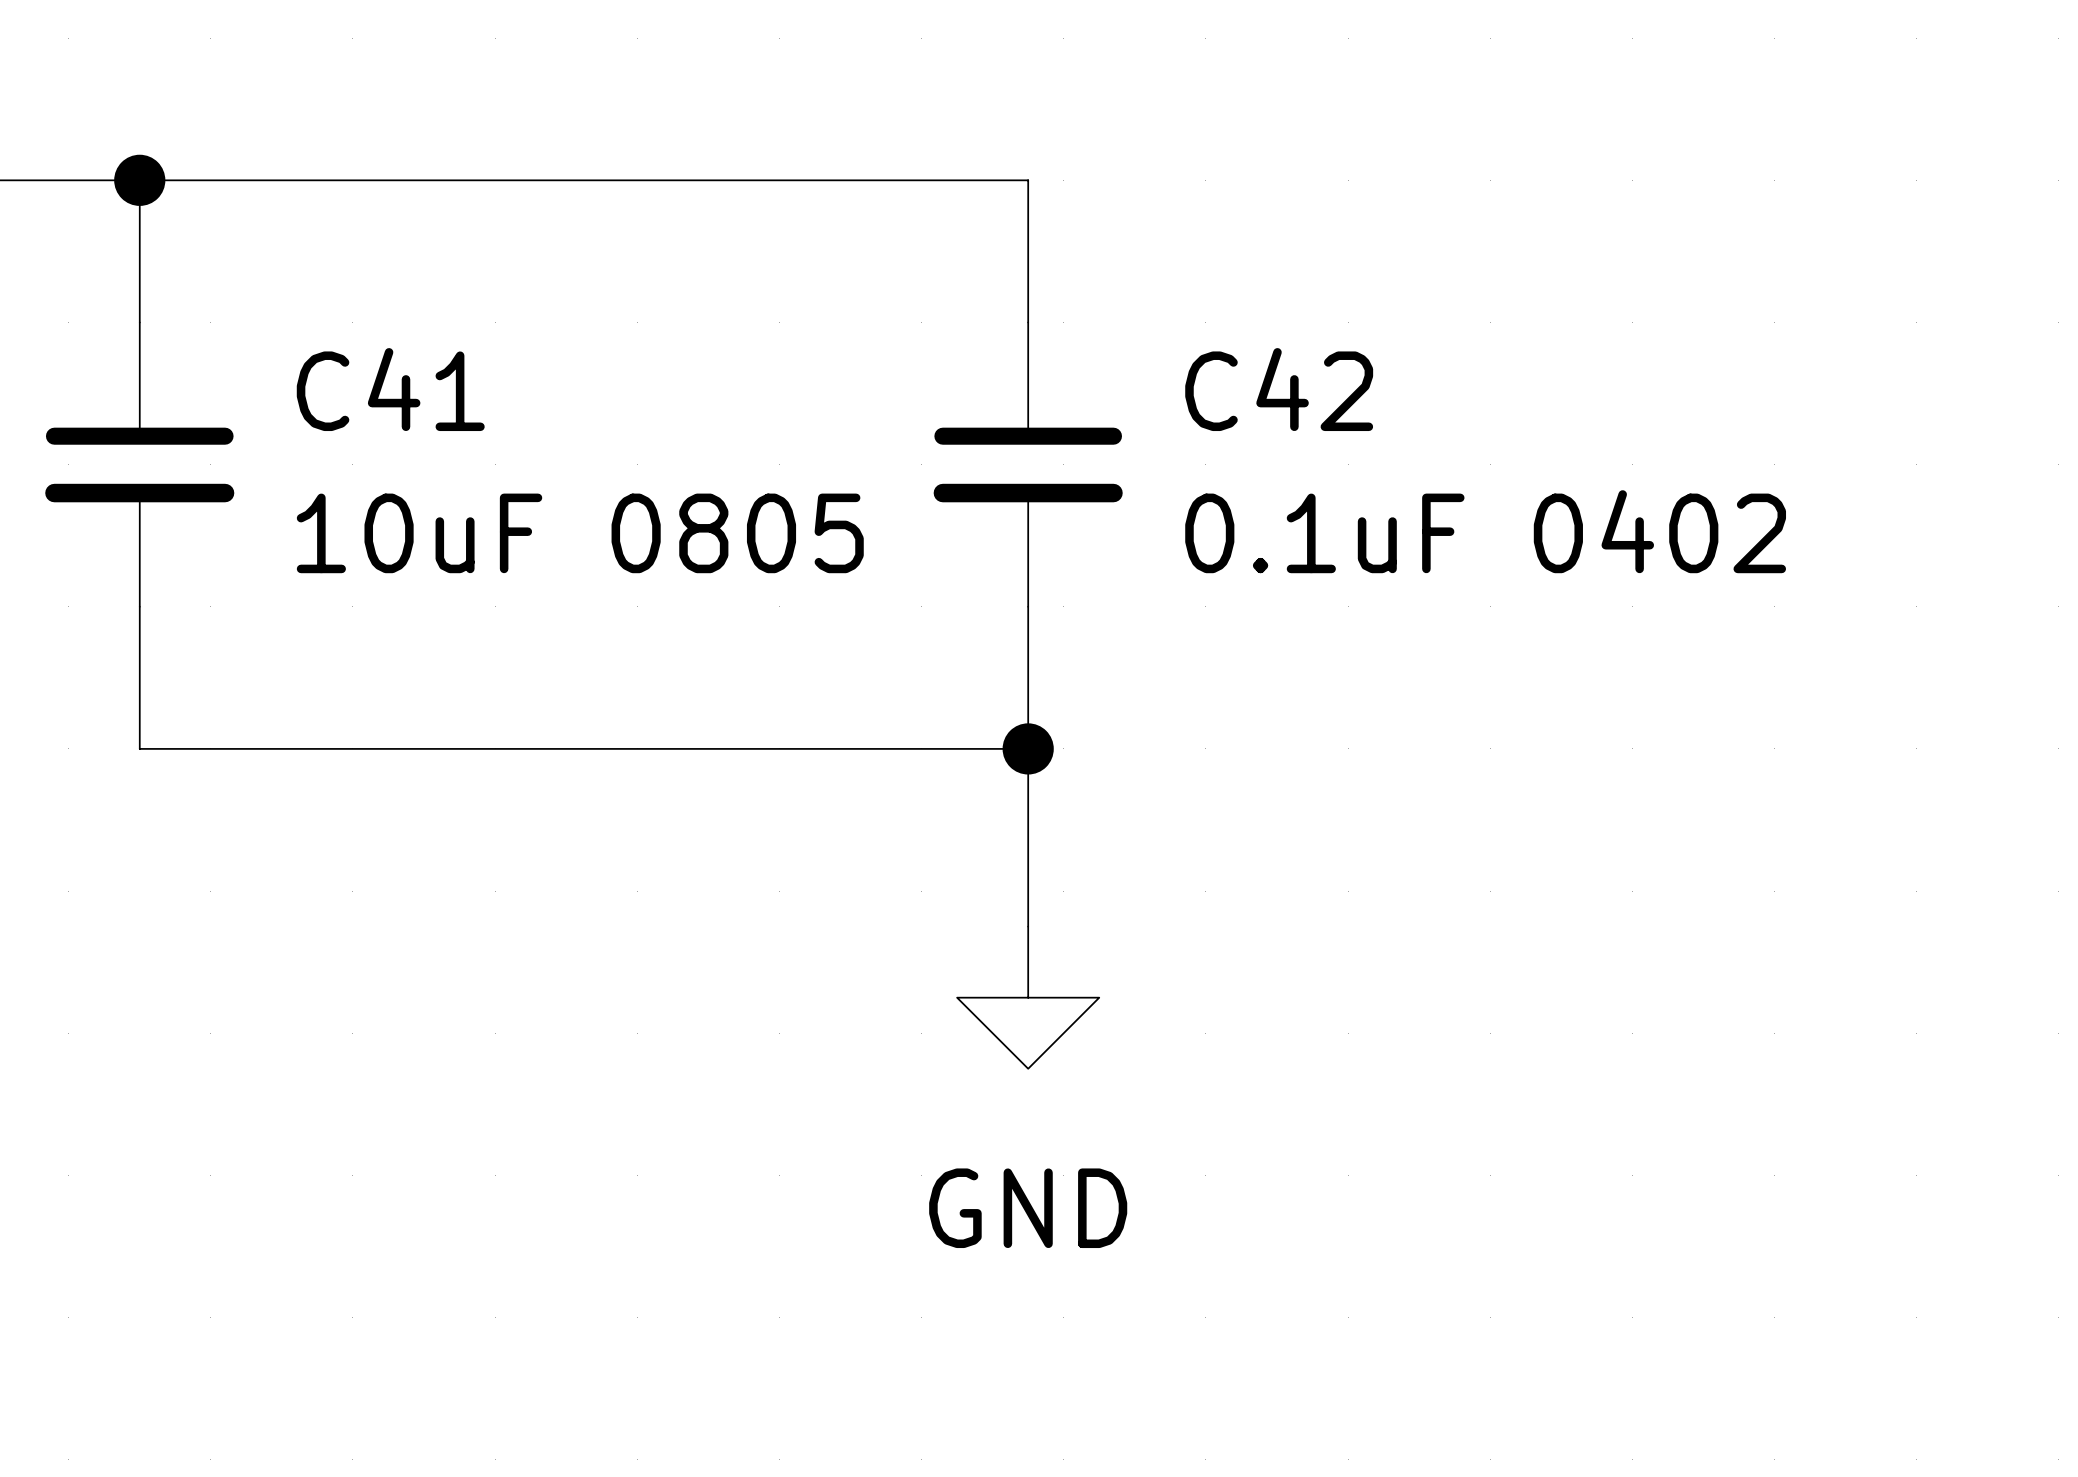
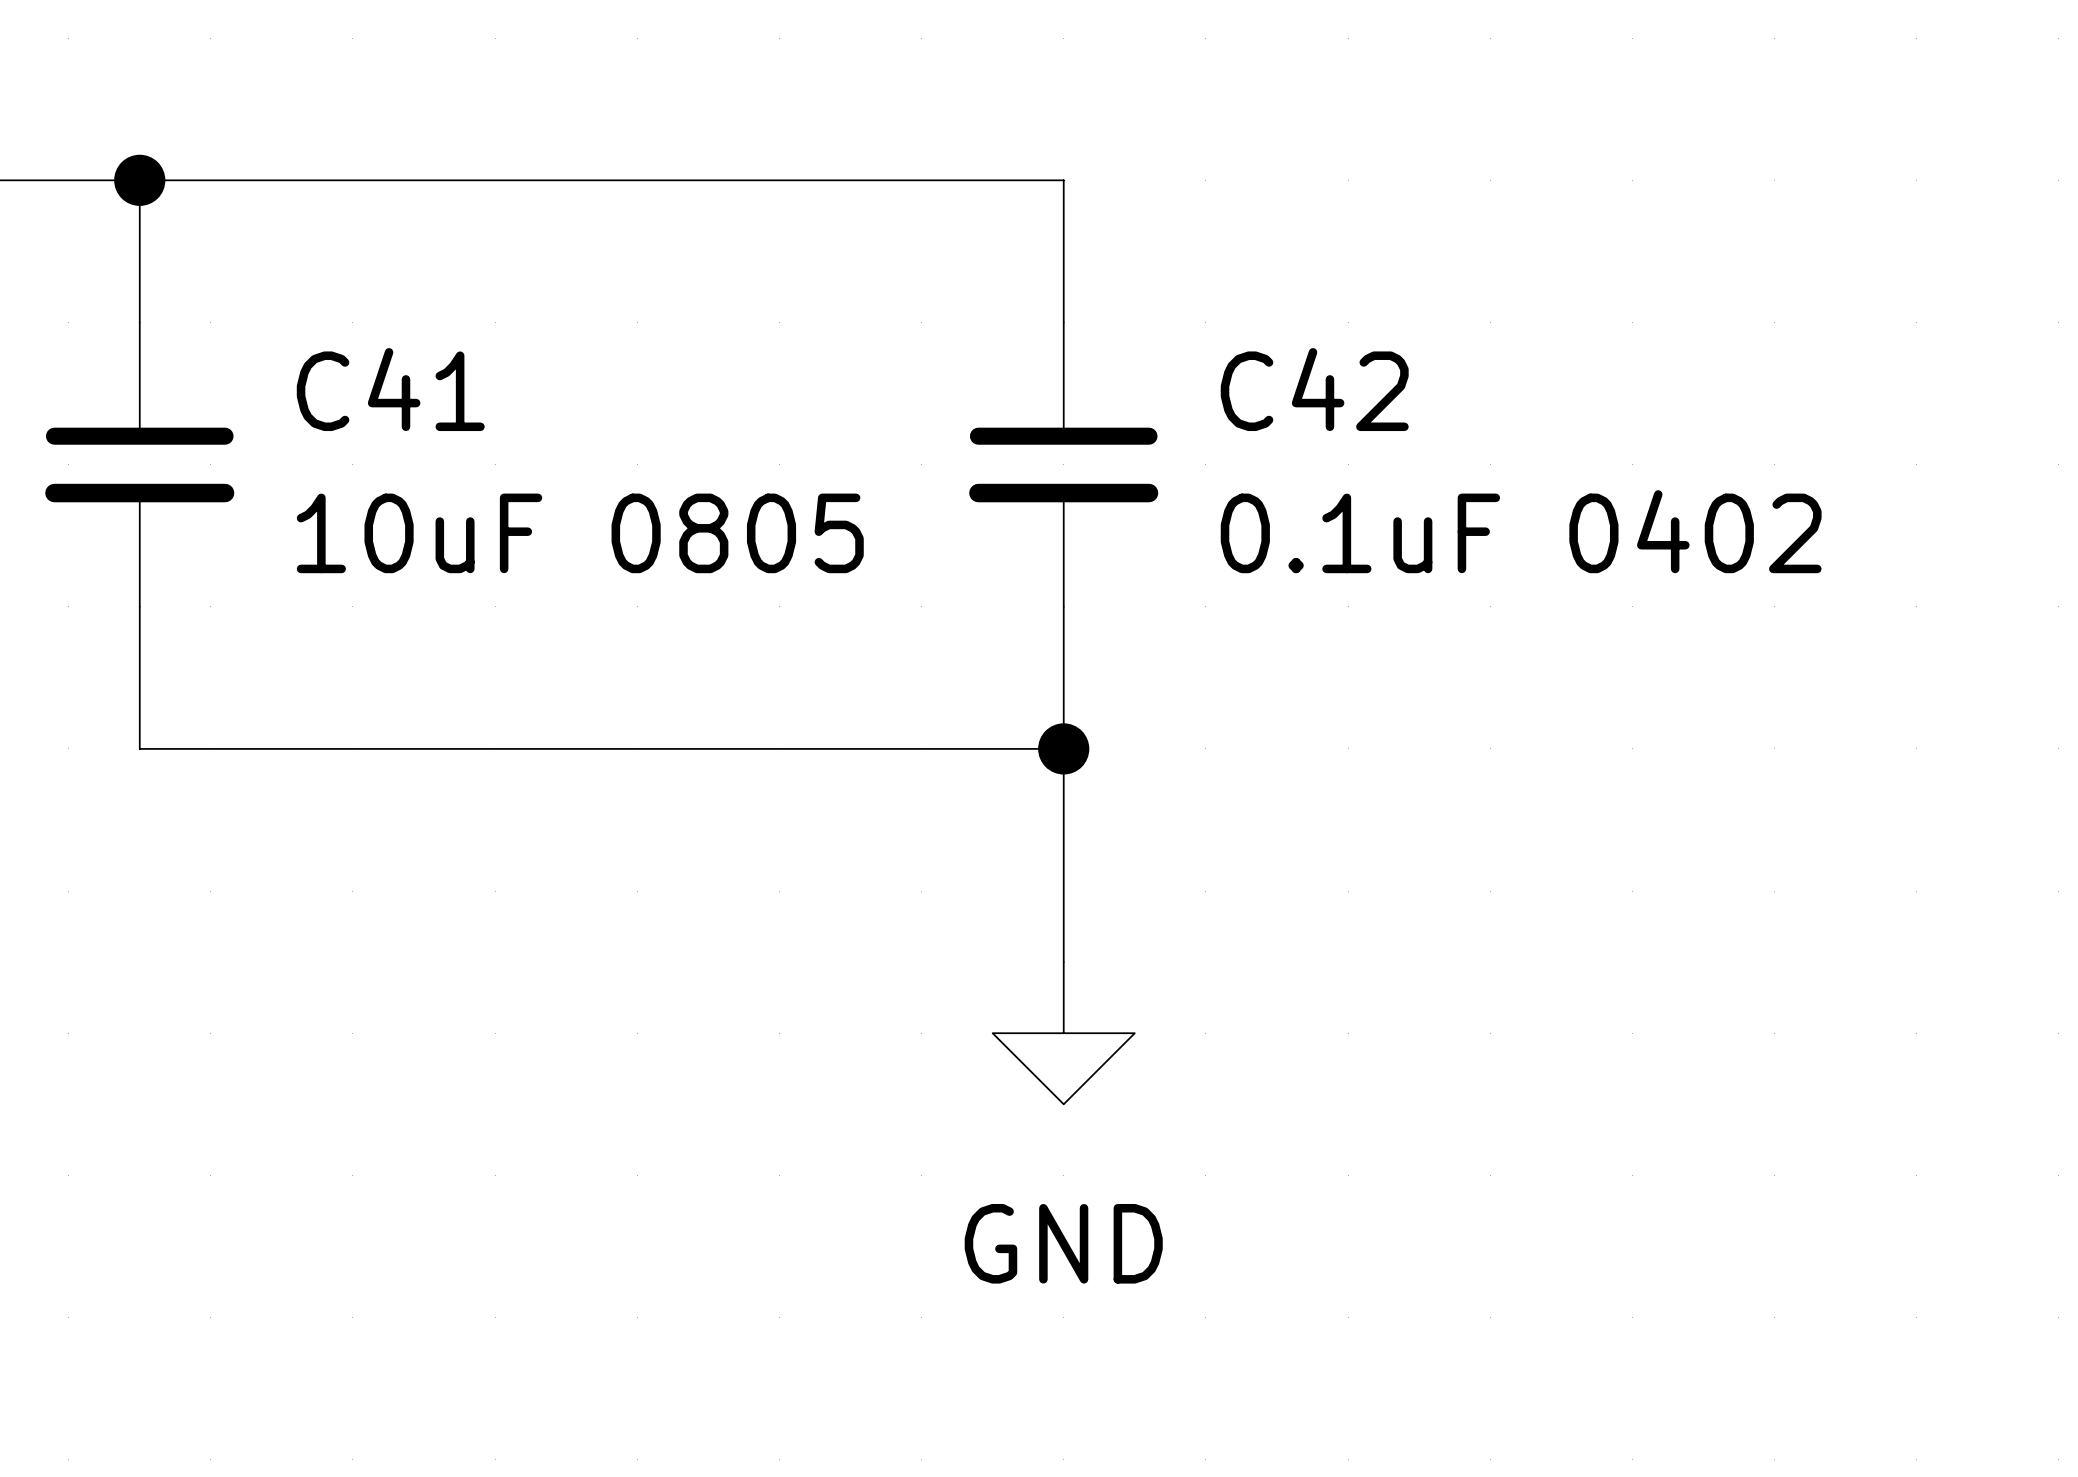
wire: (1028, 180) (1028, 322) -> (1028, 180) (1063, 180) (1063, 322)
C42 position: (1028, 464) -> (1063, 464)
wire: (1028, 606) (1028, 926) -> none
wire: none -> (1063, 606) (1063, 962)
junction position: (1028, 748) -> (1063, 748)
power symbol position: GND (1028, 997) -> GND (1063, 1033)

